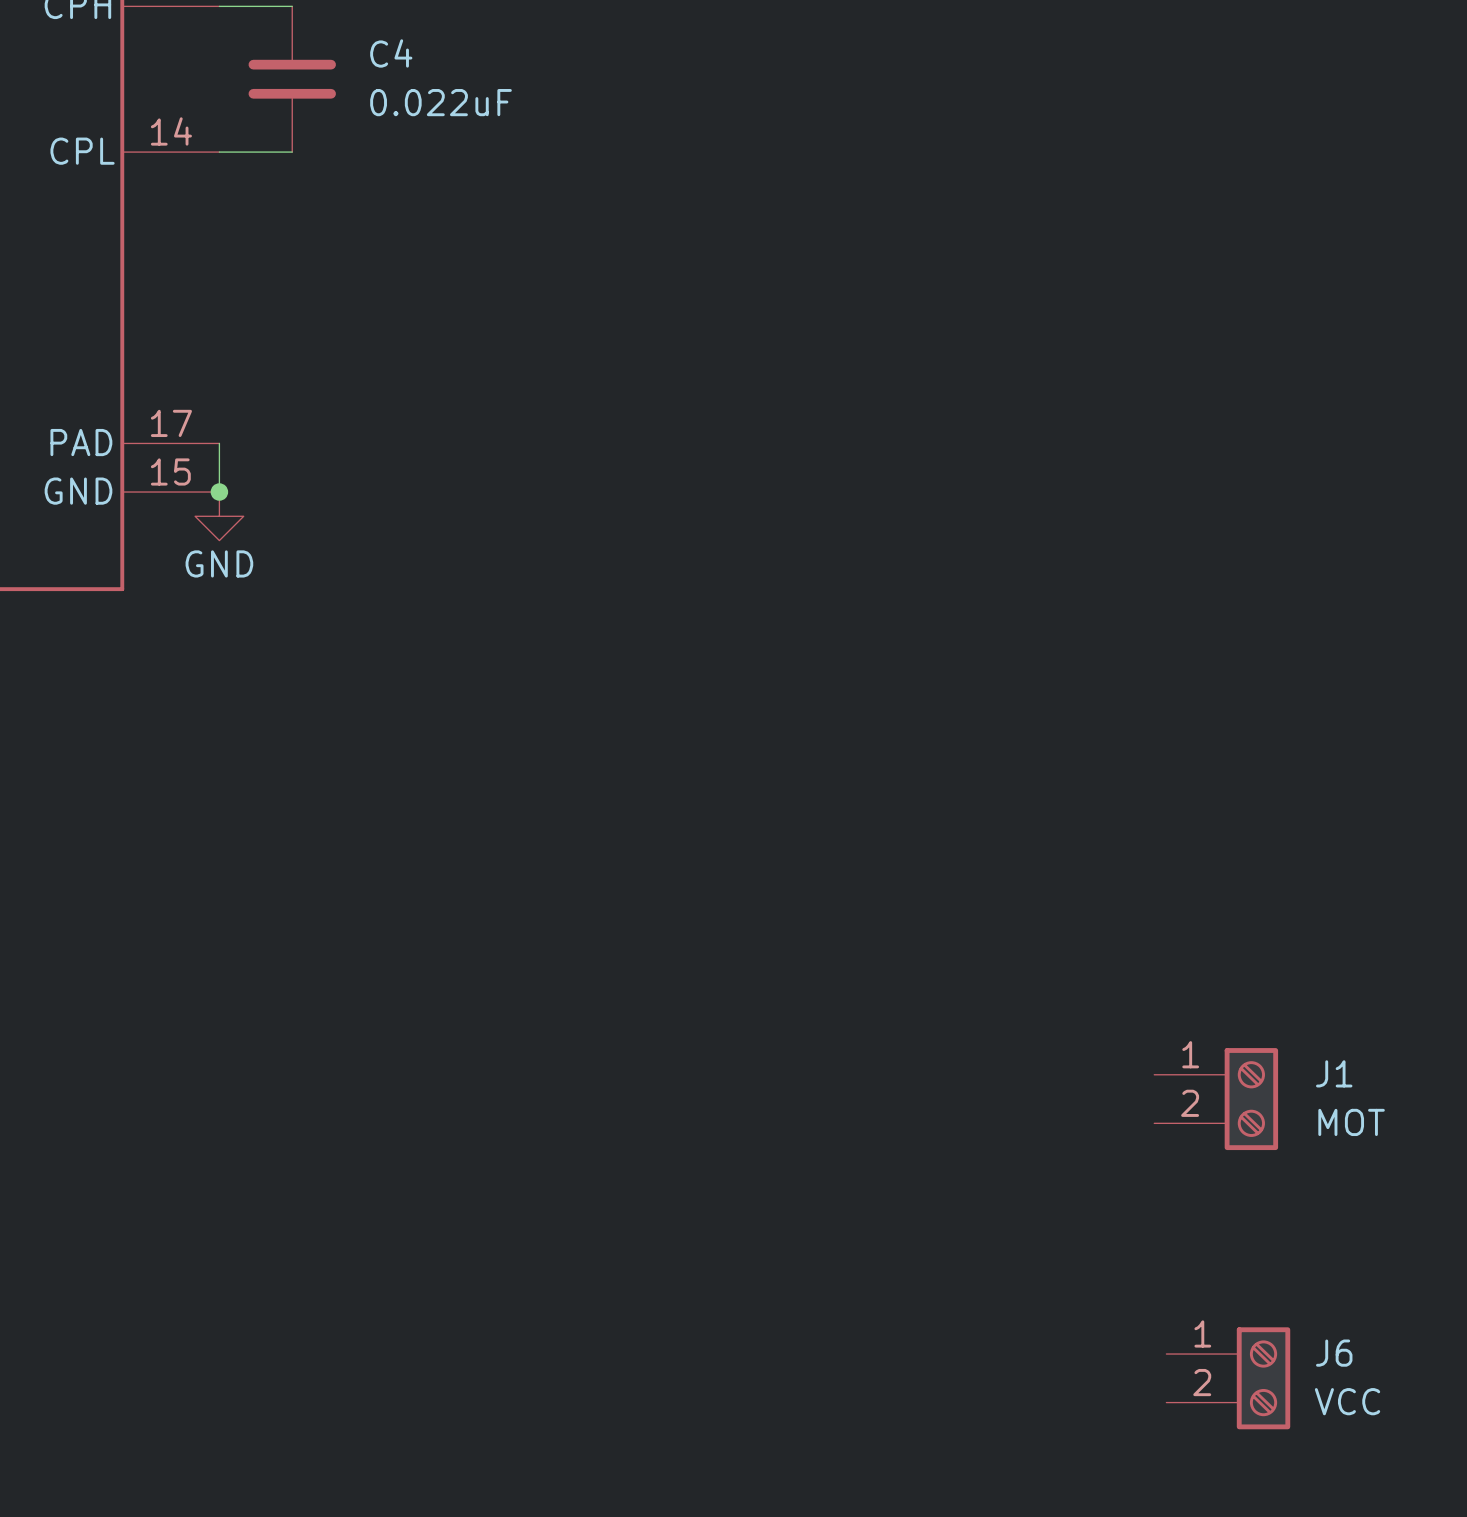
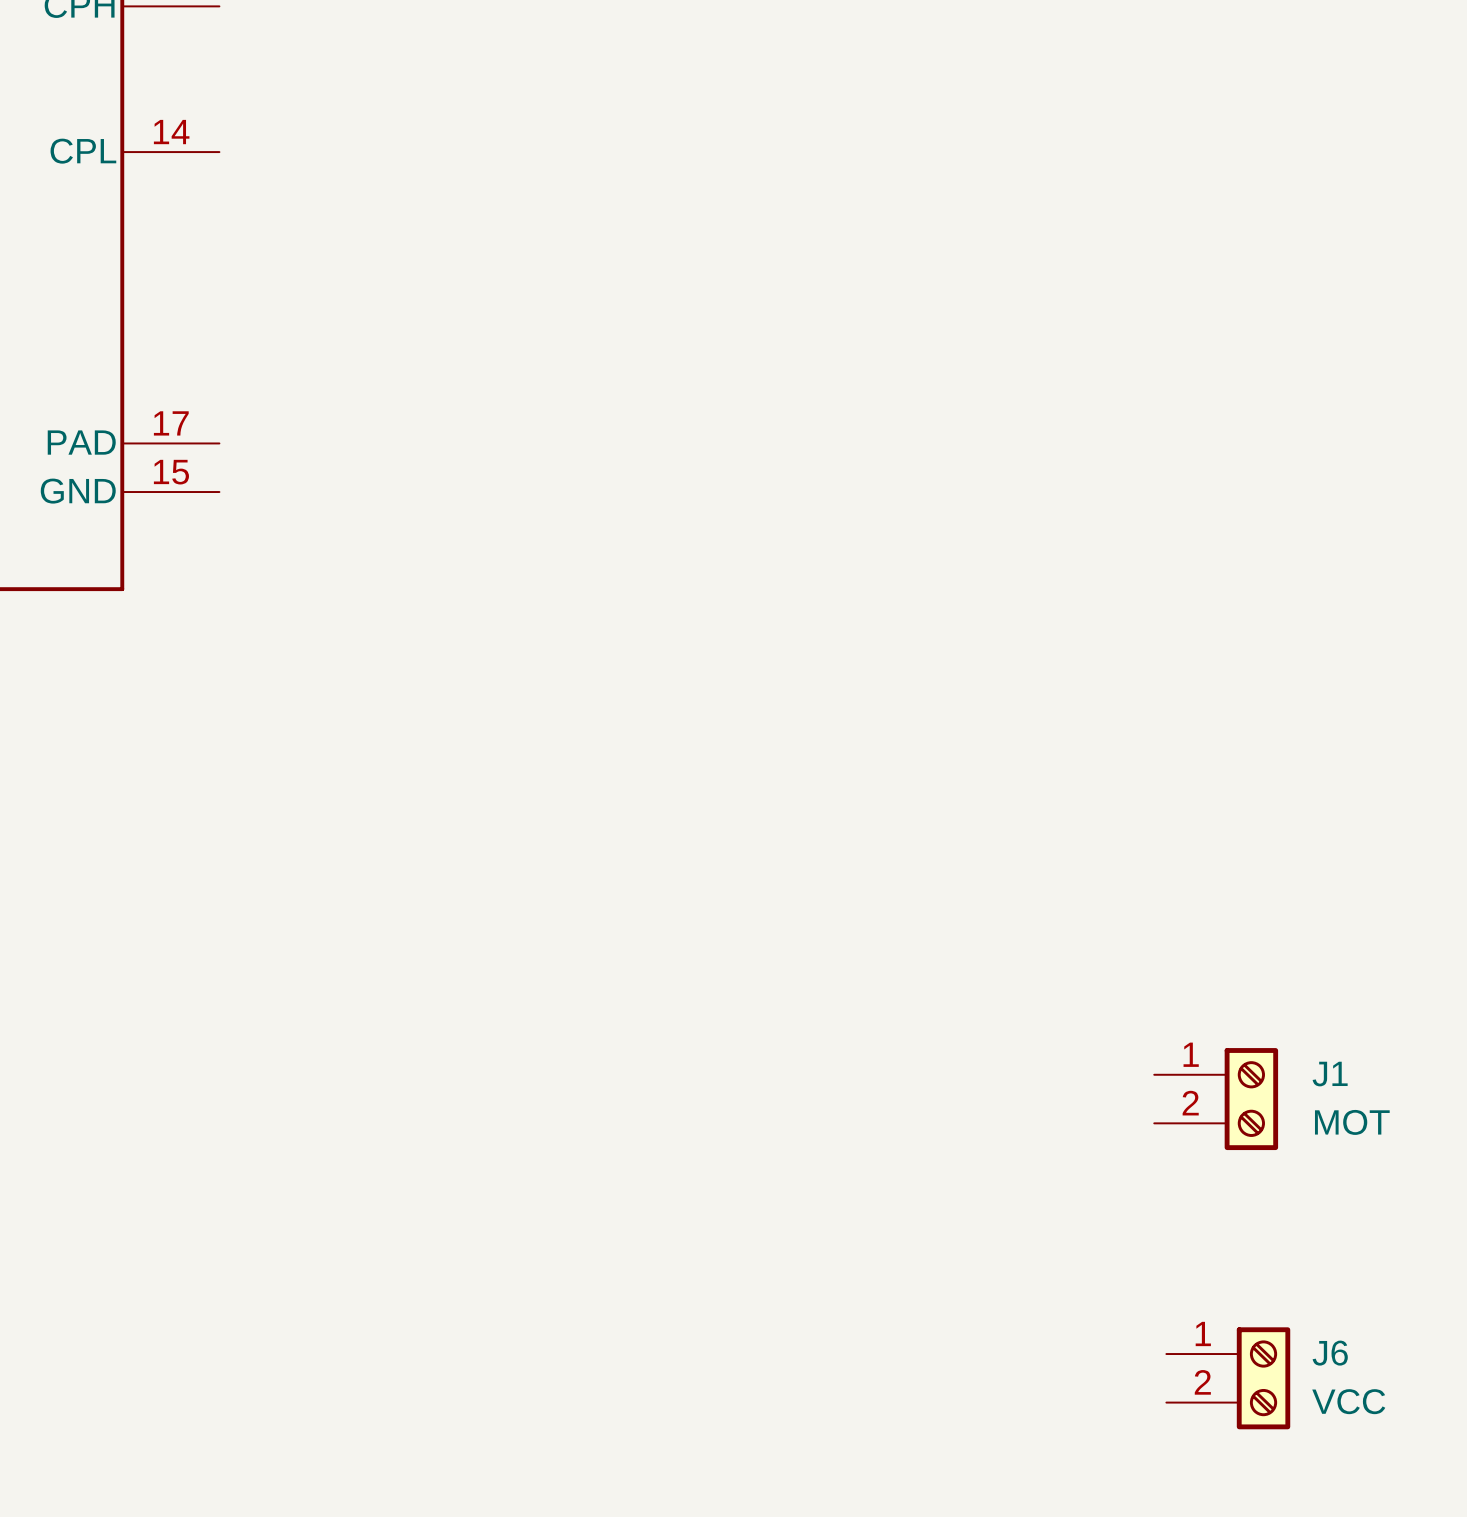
wire: (219, 6) (292, 6) -> none
C4: 0.022uF (292, 79) -> none
wire: (219, 152) (292, 152) -> none
wire: (219, 443) (219, 492) -> none
junction: (219, 492) -> none
power symbol: GND (219, 516) -> none

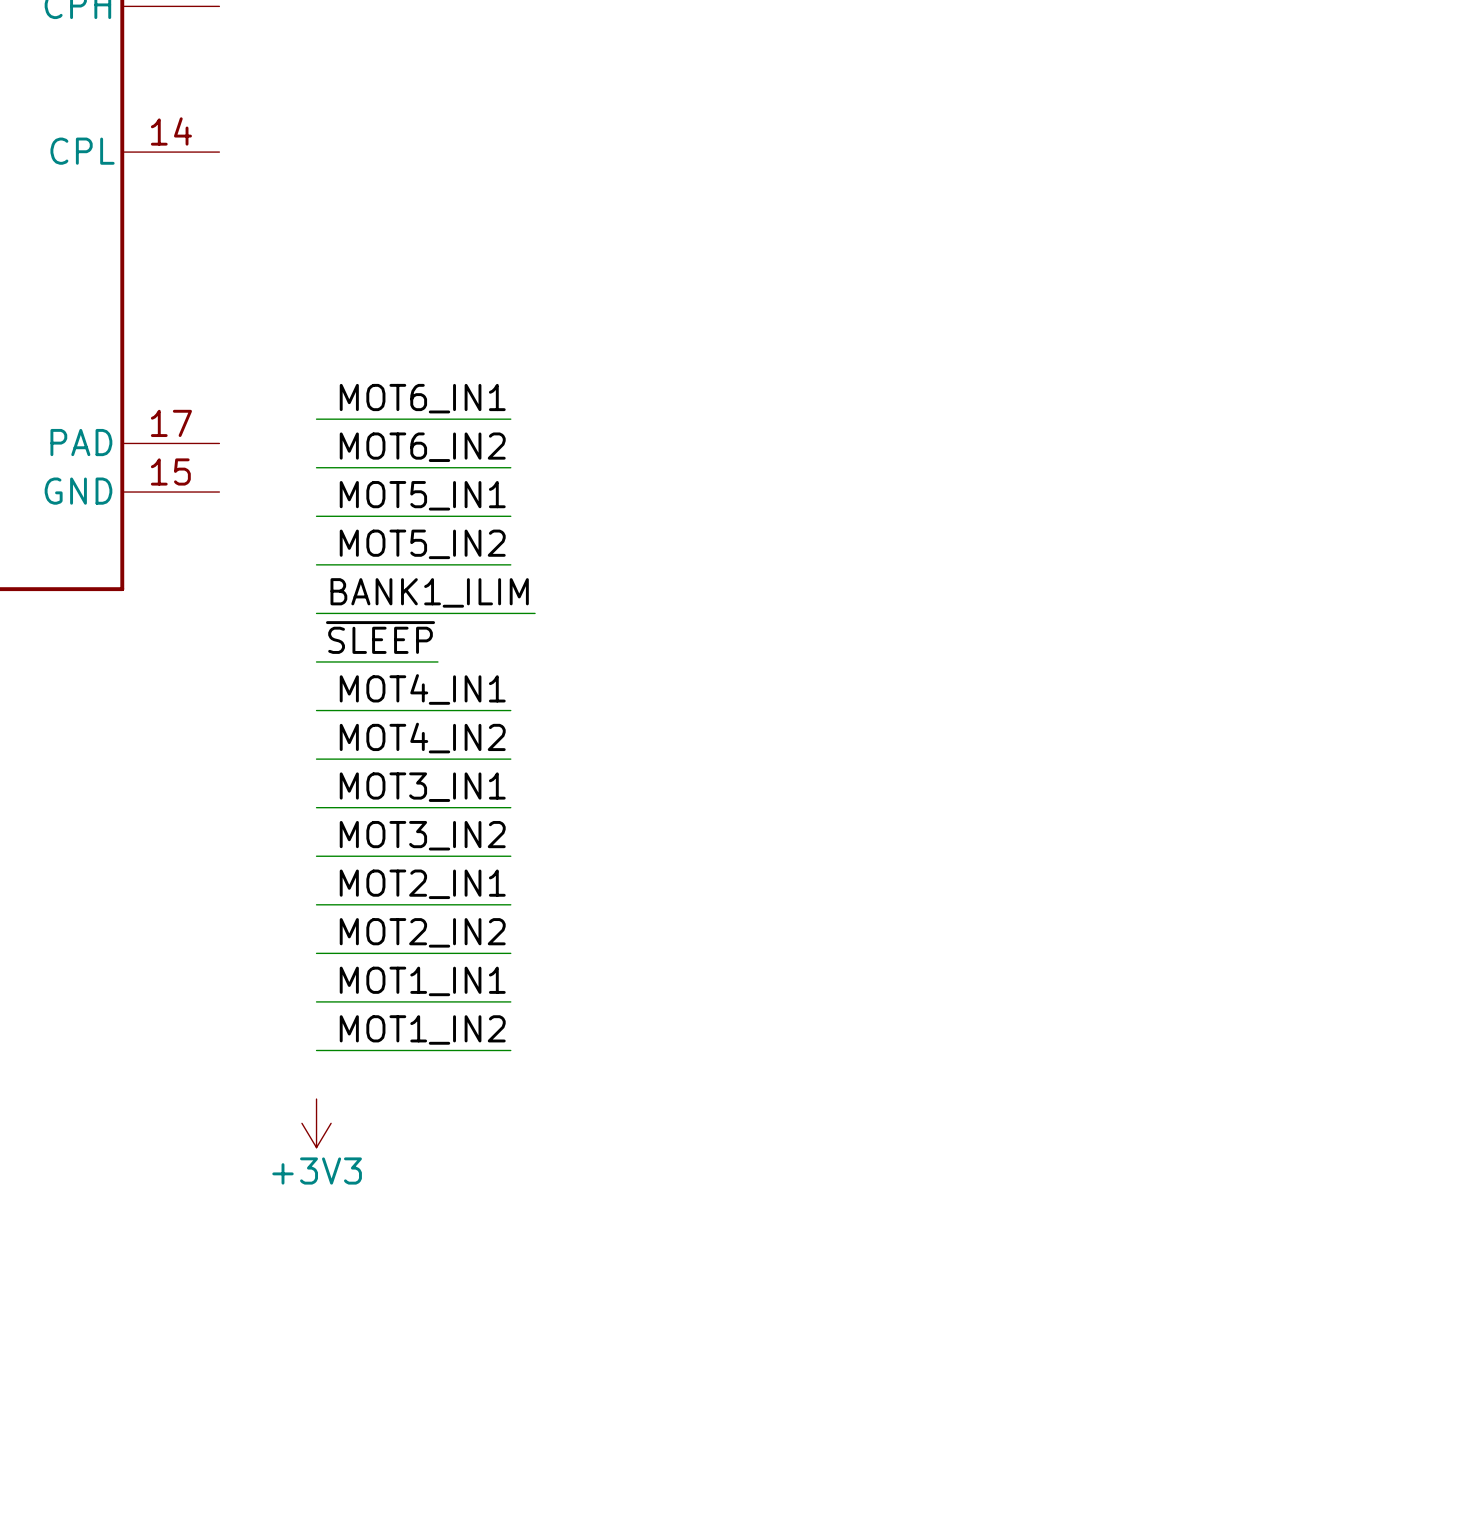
label: none -> MOT6_IN1 (422, 398)
wire: none -> (316, 419) (510, 419)
label: none -> MOT6_IN2 (422, 447)
wire: none -> (316, 467) (510, 467)
label: none -> MOT5_IN1 (422, 495)
wire: none -> (316, 516) (510, 516)
label: none -> MOT5_IN2 (422, 544)
wire: none -> (316, 564) (510, 564)
label: none -> BANK1_ILIM (429, 592)
wire: none -> (316, 613) (535, 613)
label: none -> ~{SLEEP} (380, 637)
wire: none -> (316, 661) (437, 661)
label: none -> MOT4_IN1 (422, 689)
wire: none -> (316, 710) (510, 710)
label: none -> MOT4_IN2 (422, 738)
wire: none -> (316, 759) (510, 759)
label: none -> MOT3_IN1 (422, 787)
wire: none -> (316, 807) (510, 807)
label: none -> MOT3_IN2 (422, 835)
wire: none -> (316, 856) (510, 856)
label: none -> MOT2_IN1 (422, 884)
wire: none -> (316, 904) (510, 904)
label: none -> MOT2_IN2 (422, 932)
wire: none -> (316, 953) (510, 953)
label: none -> MOT1_IN1 (422, 981)
wire: none -> (316, 1001) (510, 1001)
label: none -> MOT1_IN2 (422, 1029)
wire: none -> (316, 1050) (510, 1050)
J1: MOT (1216, 1099) -> none
power symbol: none -> +3V3 (316, 1123)
J6: VCC (1228, 1378) -> none

